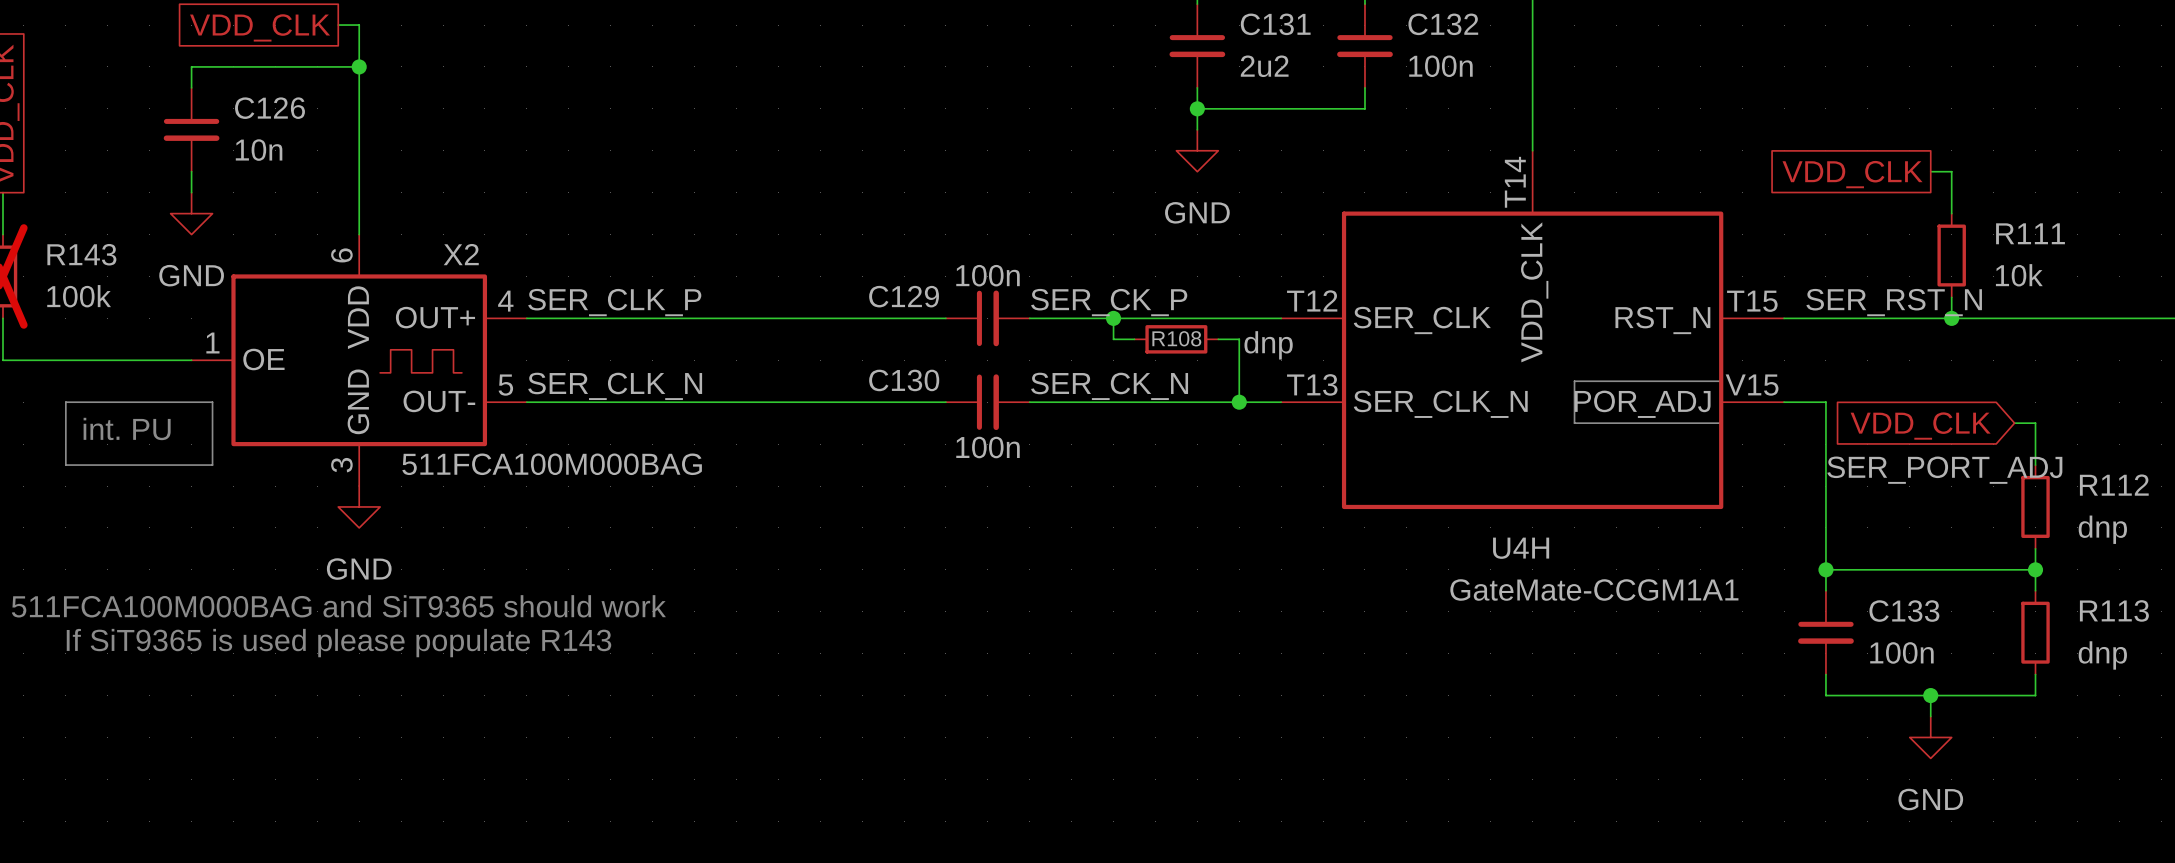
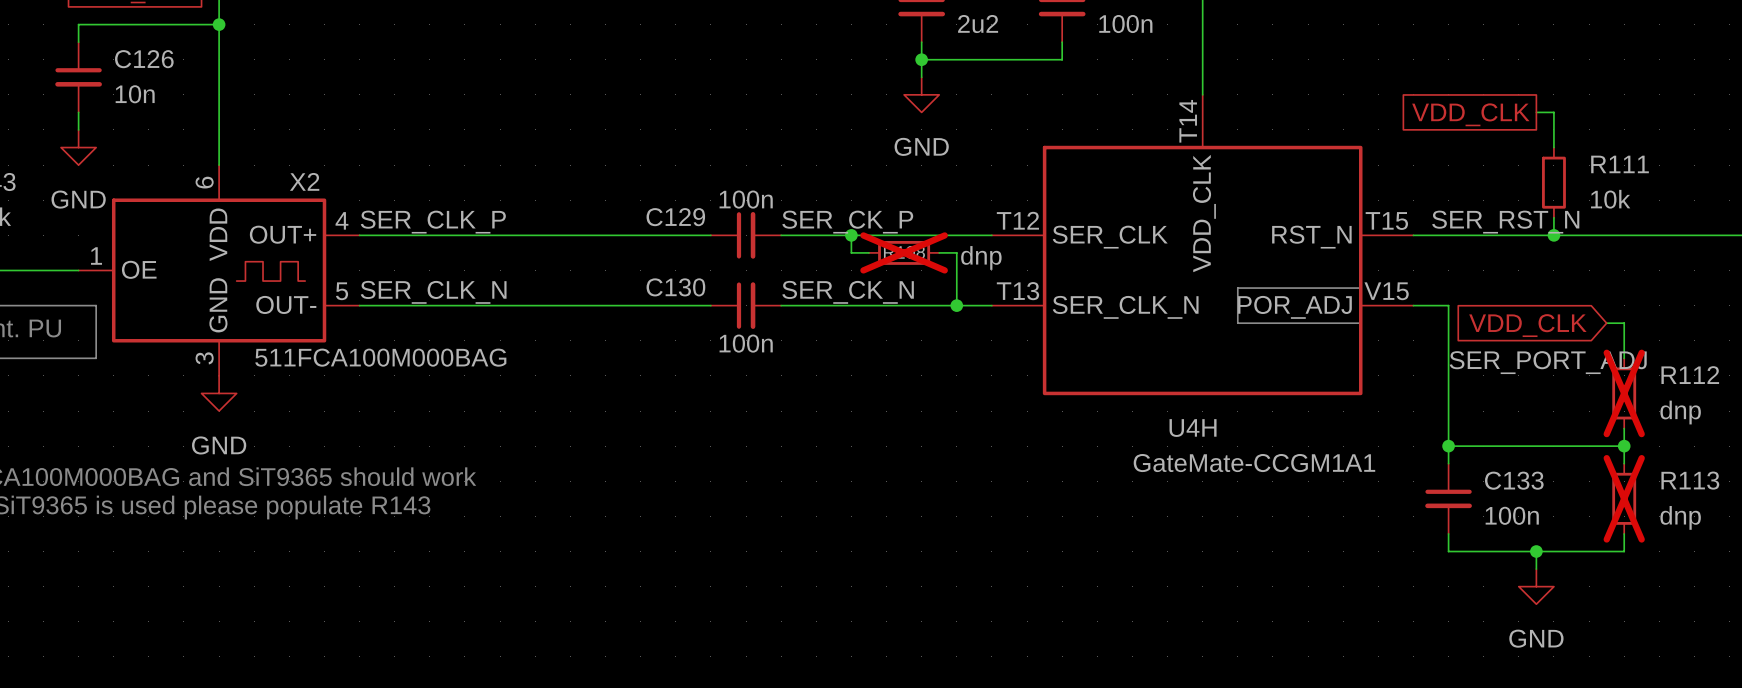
R108 do-not-place cross: none -> (904, 252)
R112 do-not-place cross: none -> (1624, 393)
R113 do-not-place cross: none -> (1624, 498)

